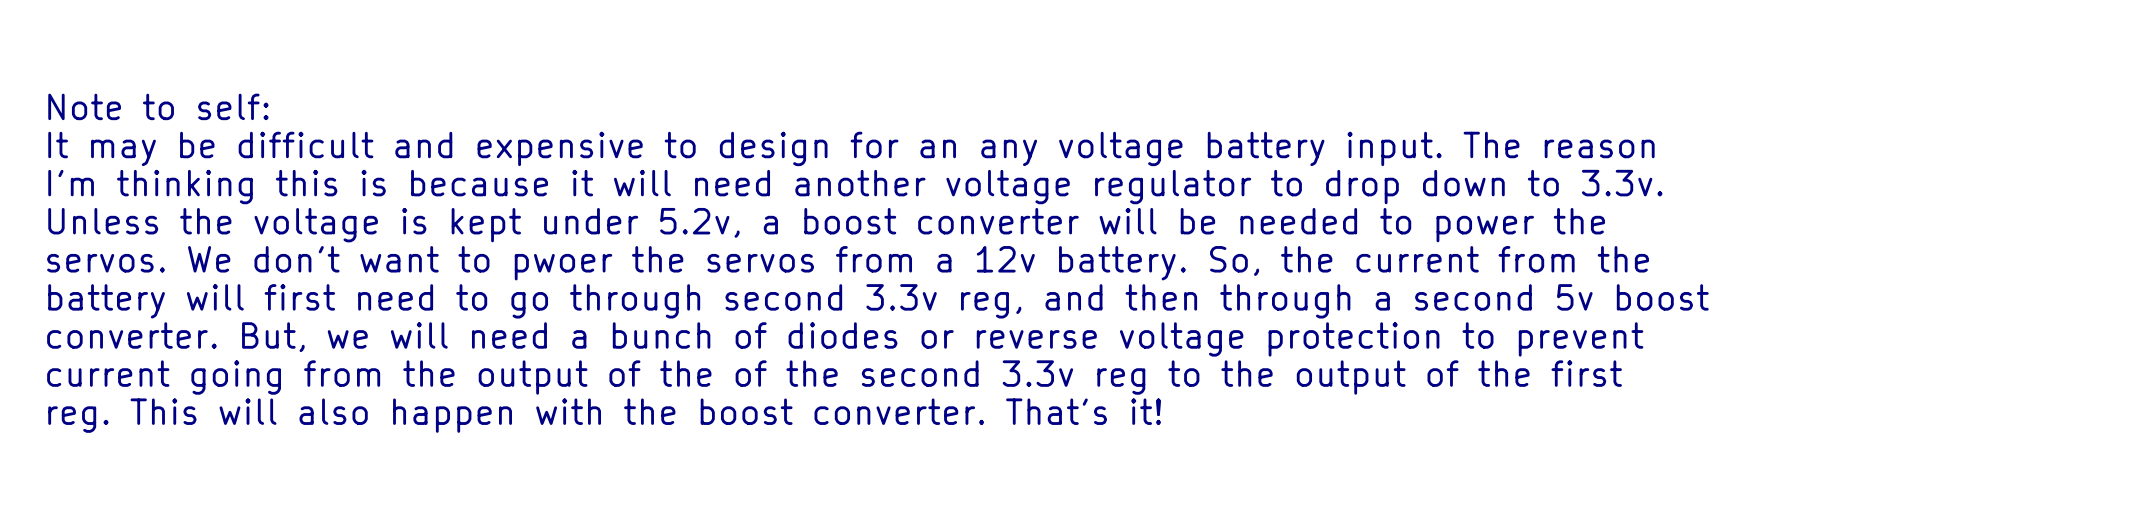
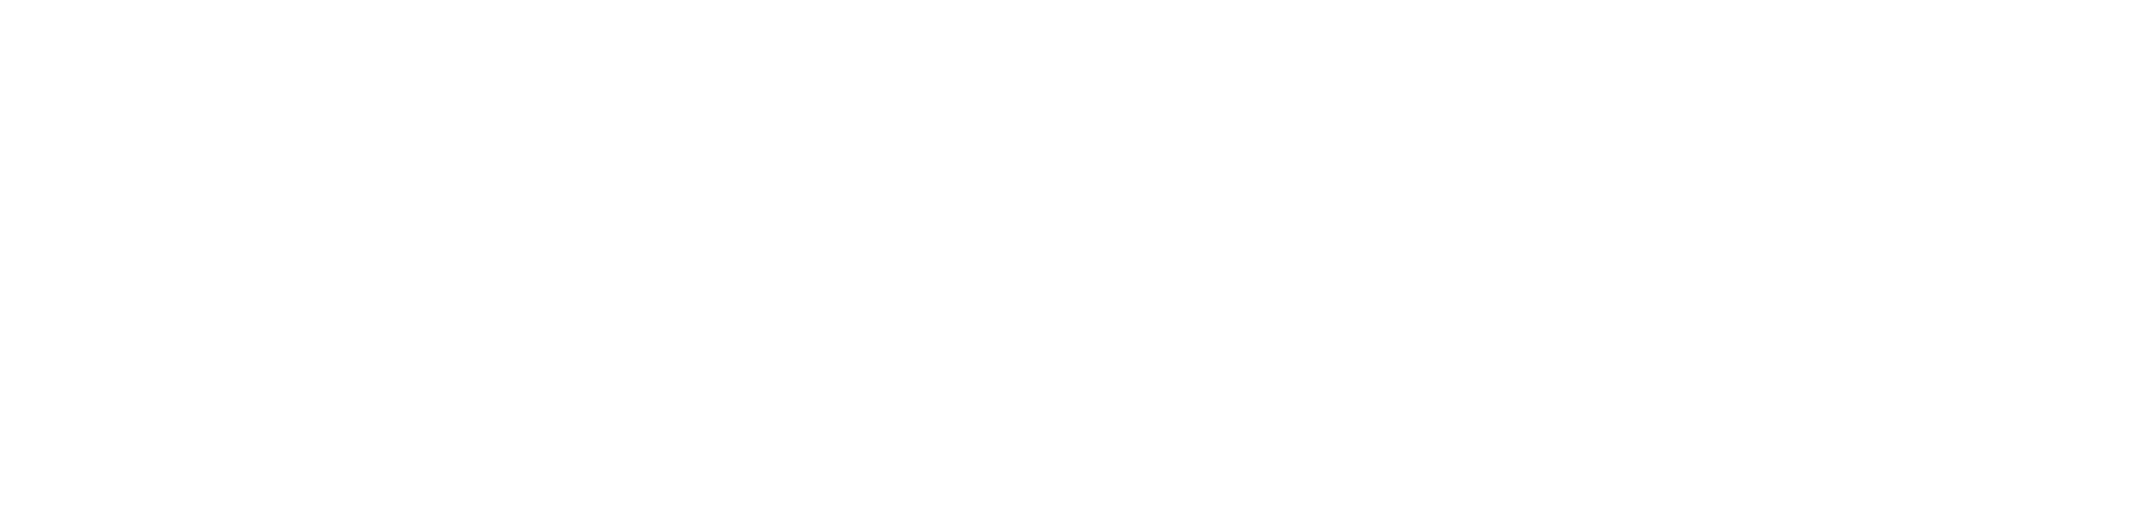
text: Note to self: (158, 106) -> none
text: It may be difficult and expensive to design for an any voltage battery input. The reason (851, 148) -> none
text: I'm thinking this is because it will need another voltage regulator to drop down to 3.3v. (855, 187) -> none
text: Unless the voltage is kept under 5.2v, a boost converter will be needed to power the (826, 225) -> none
text: servos. We don't want to pwoer the servos from a 12v battery. So, the current from the (848, 263) -> none
text: battery will first need to go through second 3.3v reg, and then through a second 5v boost (878, 301) -> none
text: converter. But, we will need a bunch of diodes or reverse voltage protection to prevent (845, 339) -> none
text: current going from the output of the of the second 3.3v reg to the output of the first (834, 377) -> none
text: reg. This will also happen with the boost converter. That's it! (604, 415) -> none

